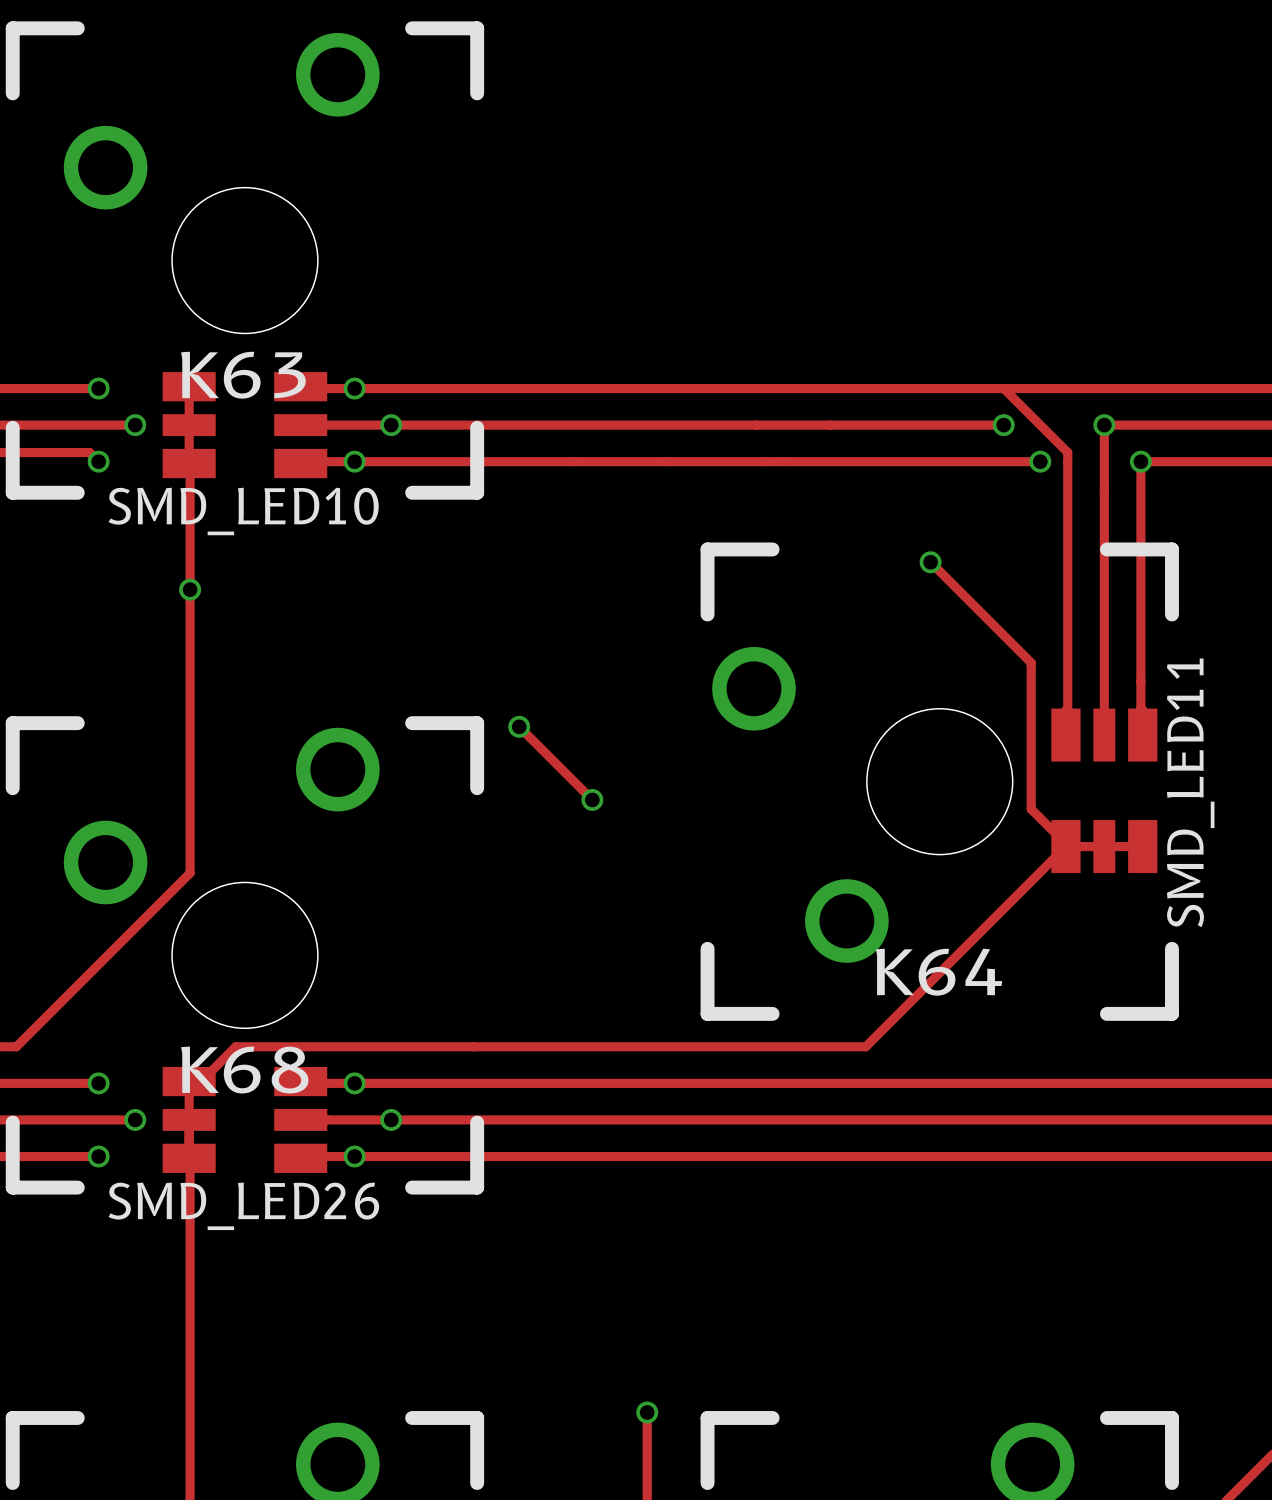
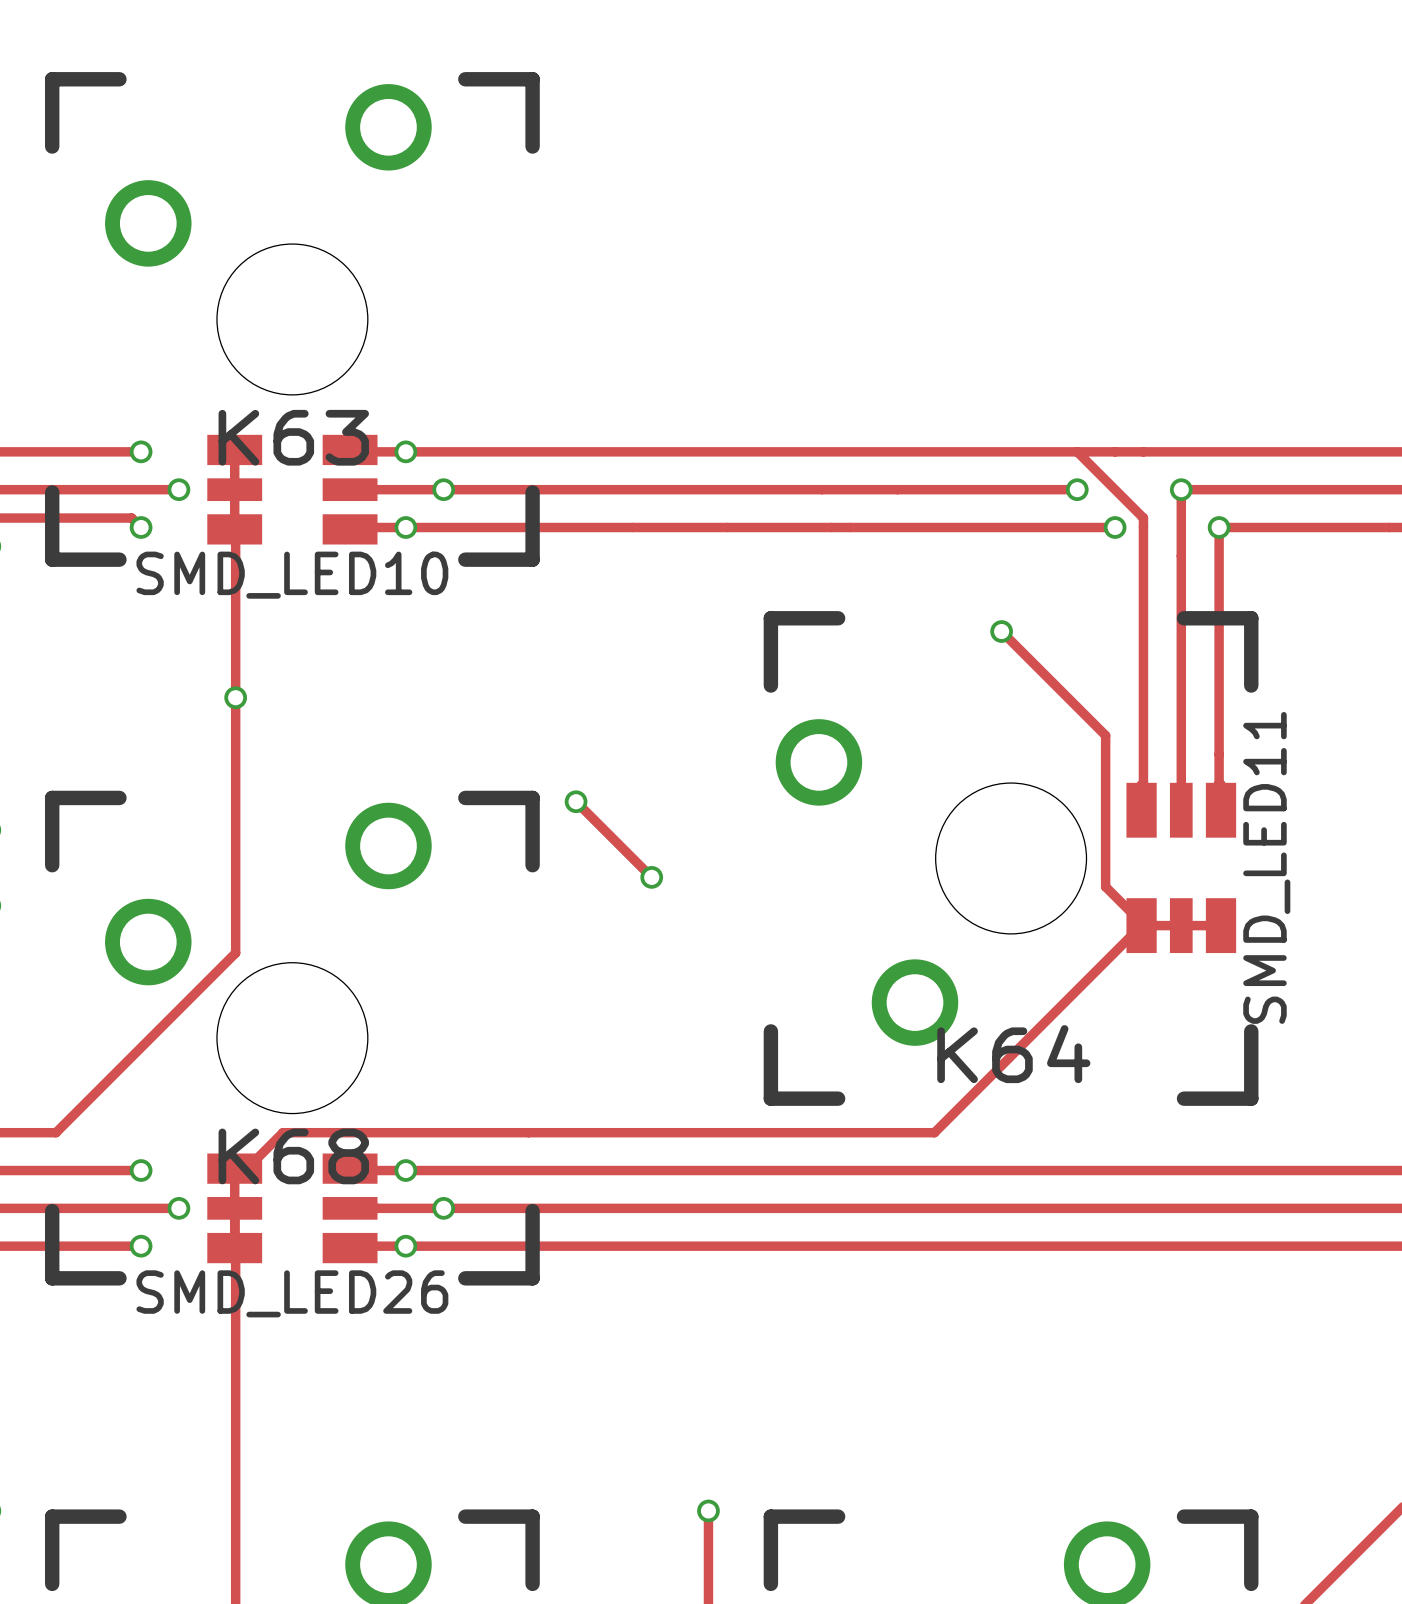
via position: (190, 589) -> (235, 697)

